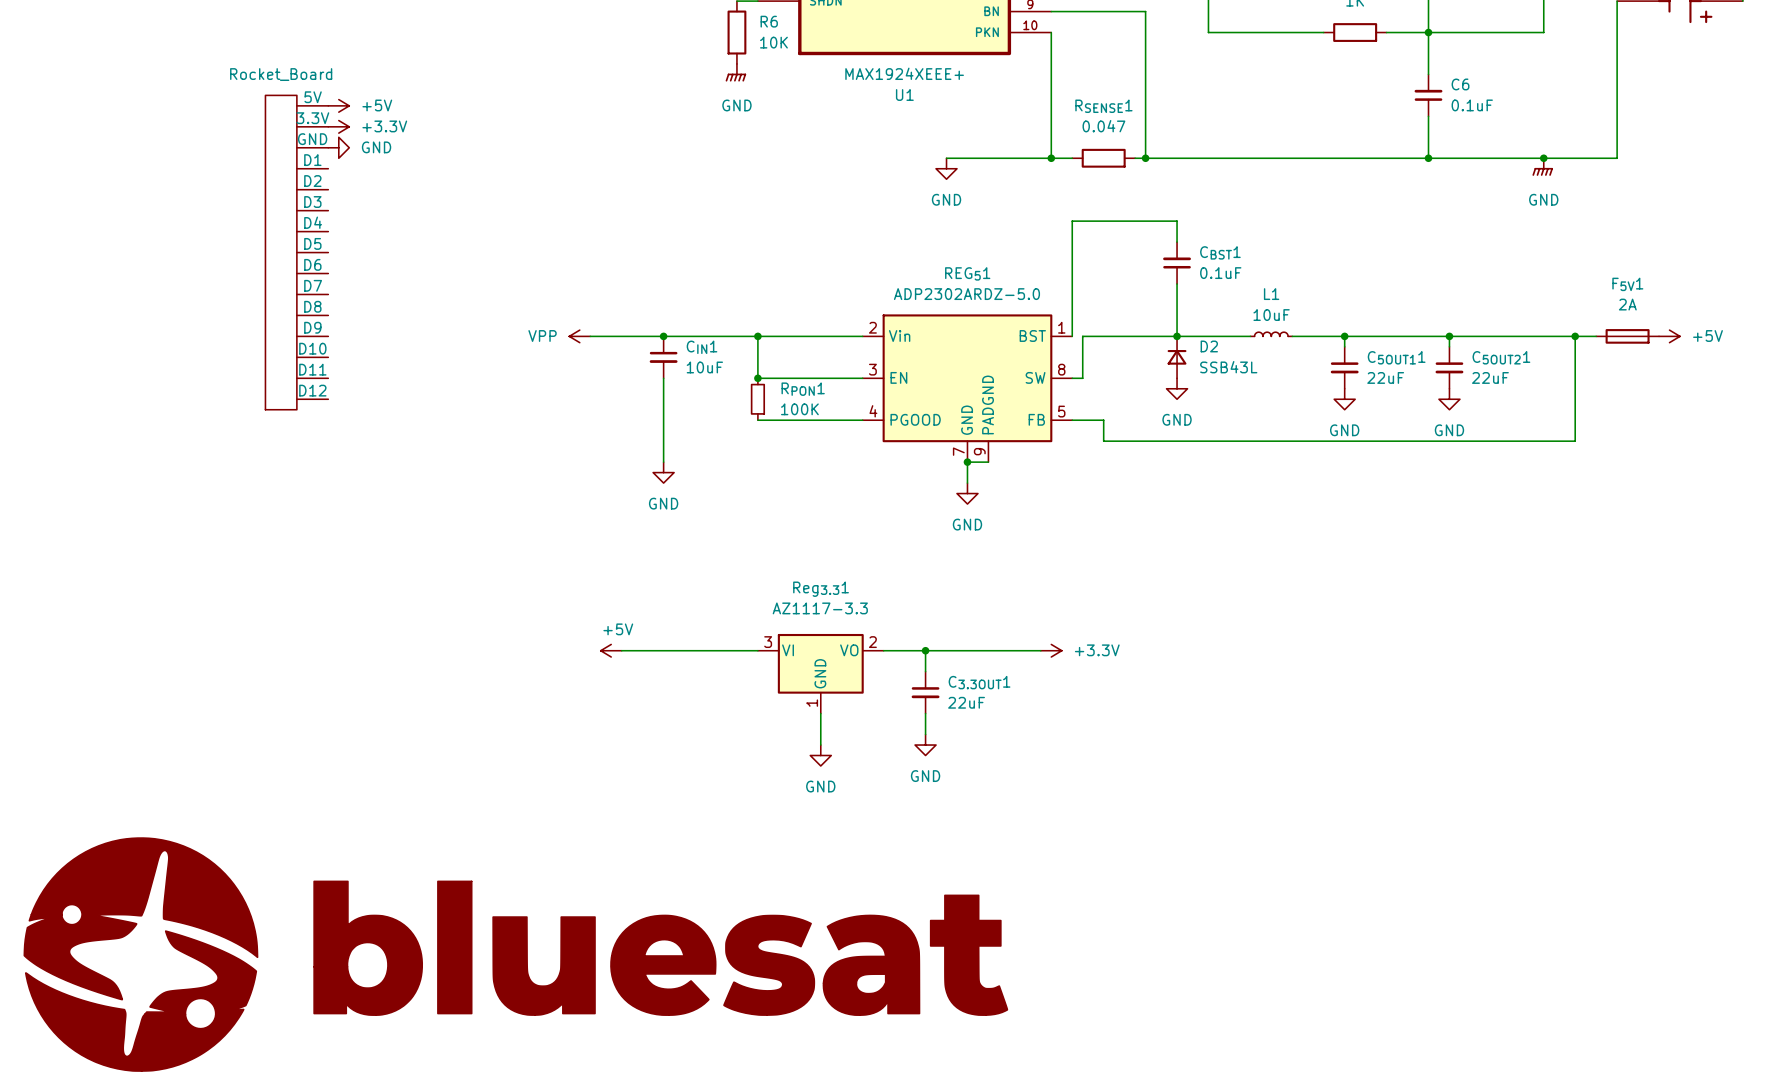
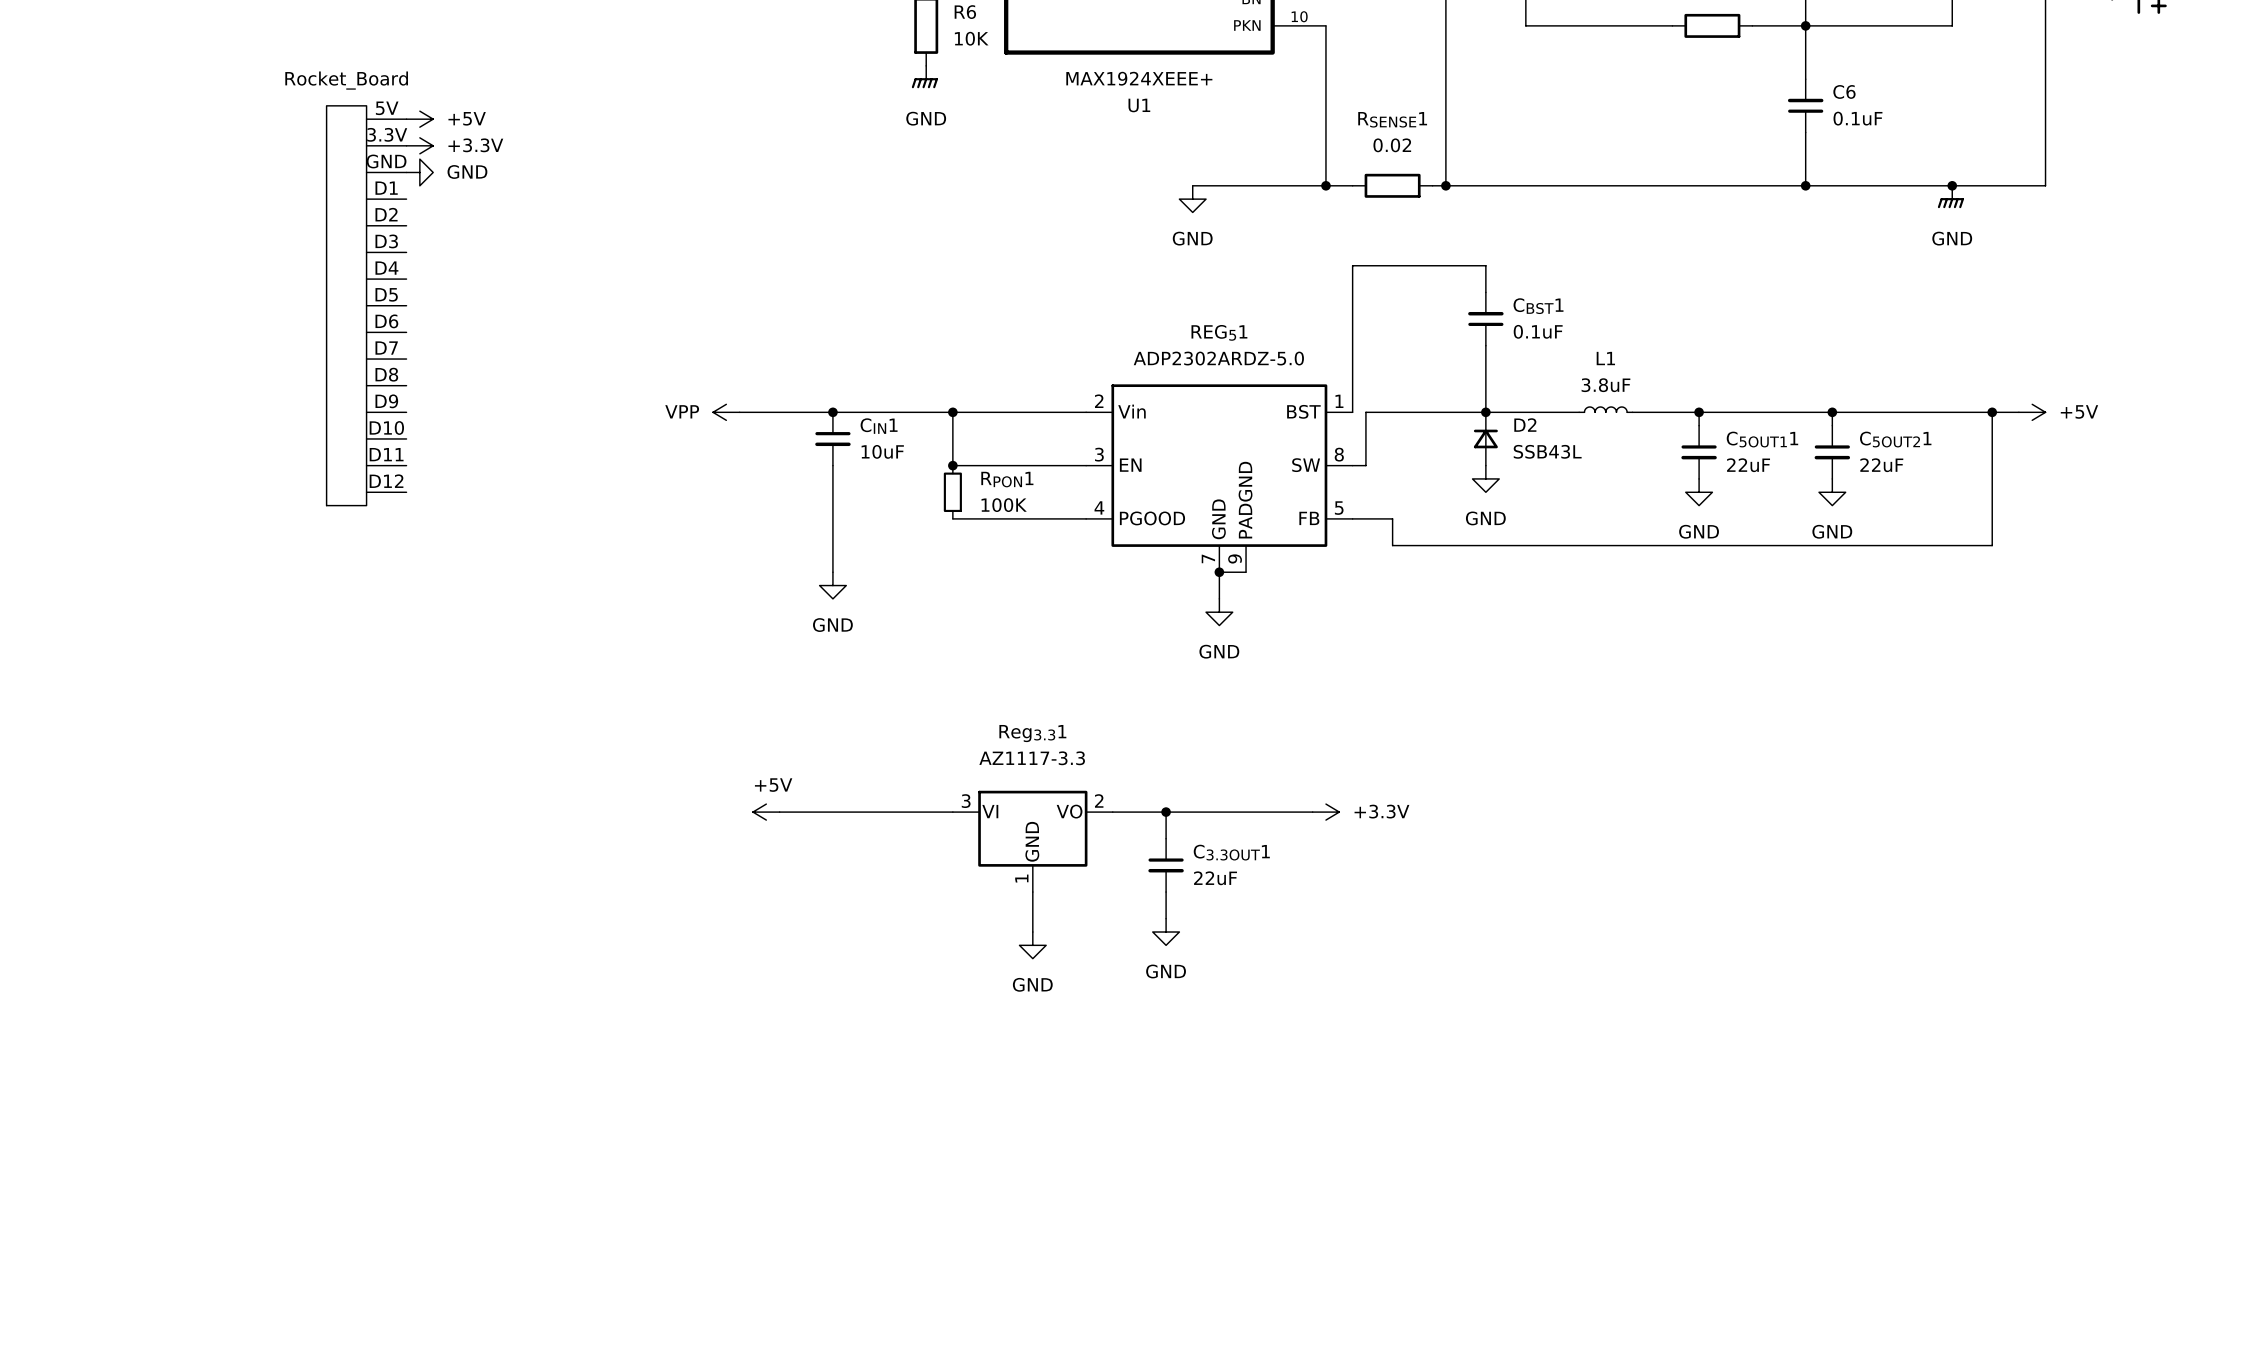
RSENSE1 value: 0.047 (1103, 126) -> 0.02 (1392, 145)
L1 value: 10uF (1271, 315) -> 3.8uF (1605, 385)
F5V1: 2A (1627, 336) -> none
power symbol position: +5V (1669, 336) -> +5V (2032, 412)
power symbol: (515, 954) -> none

